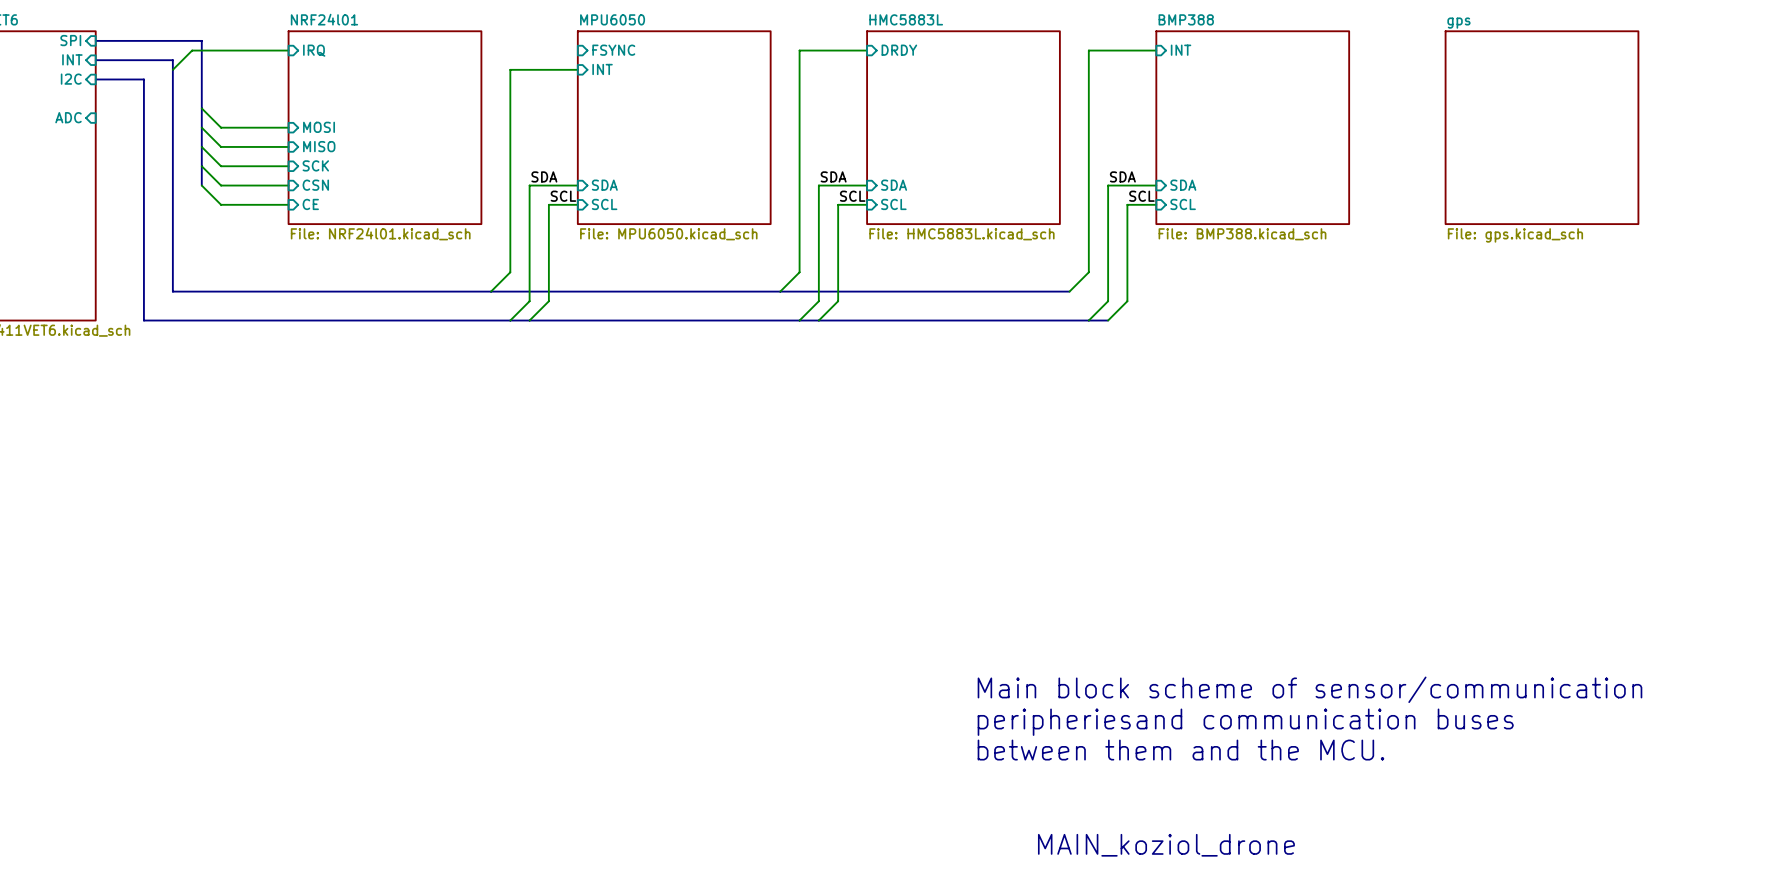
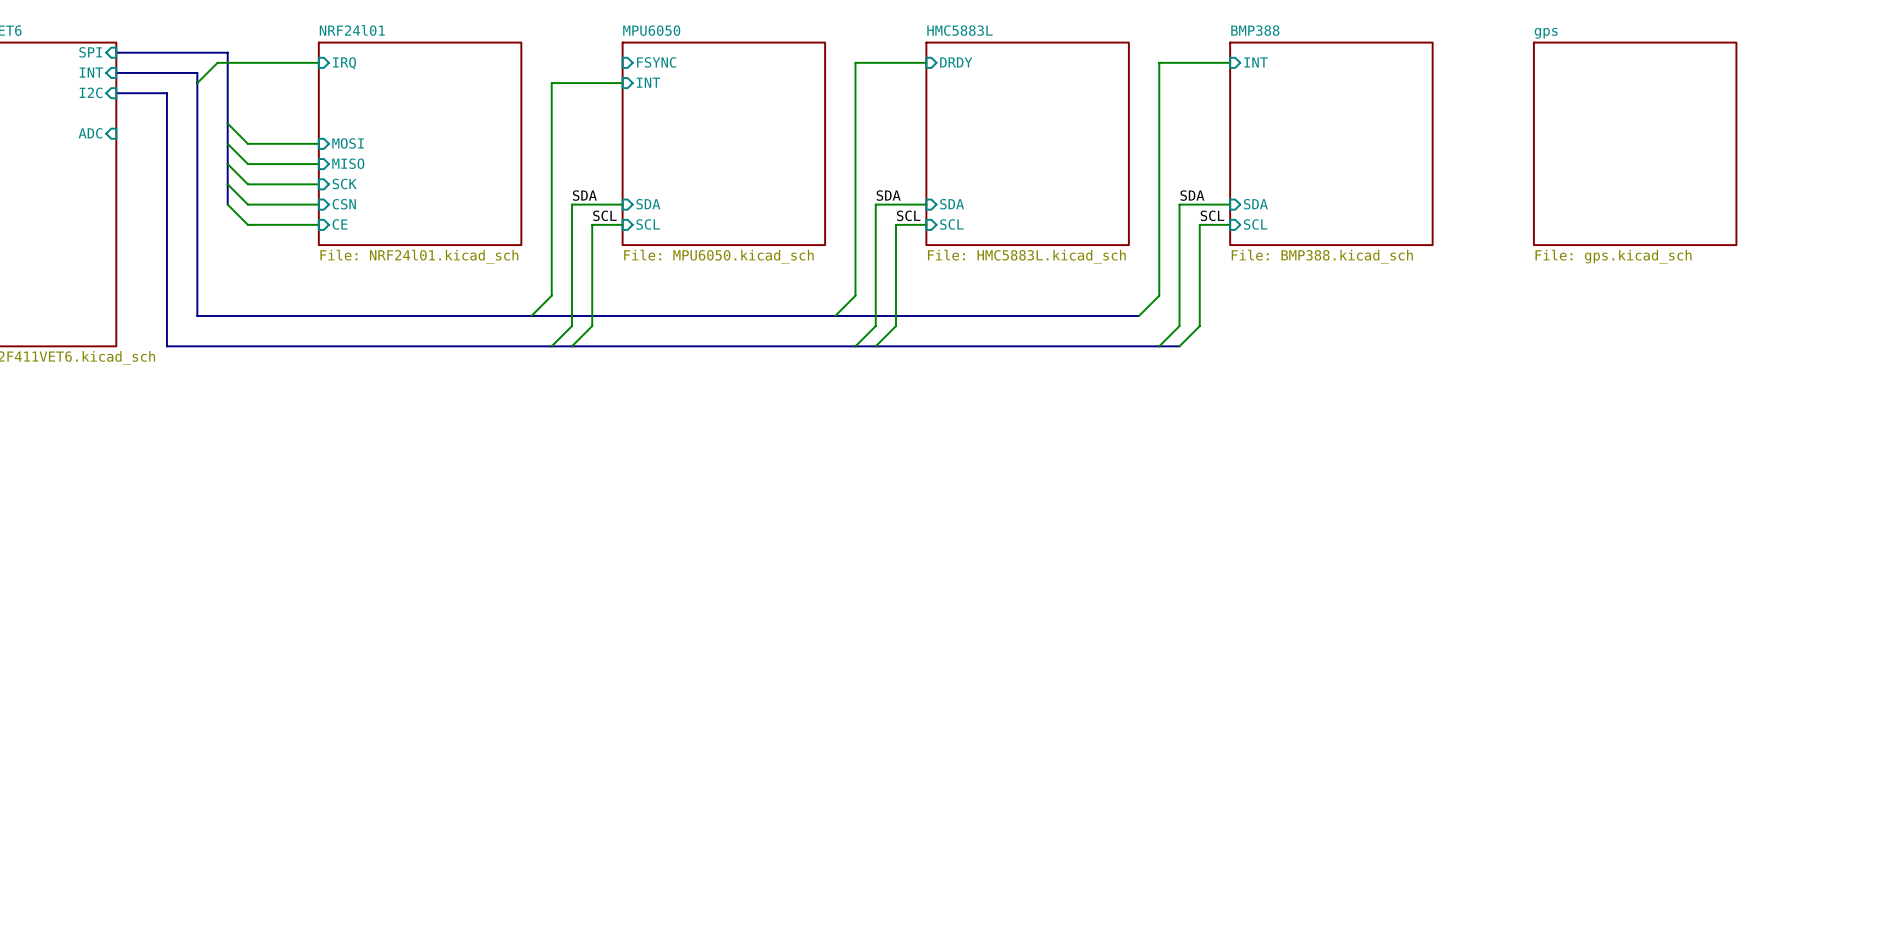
text: Main block scheme of sensor/communication (1309, 689) -> none
text: peripheriesand communication buses (1245, 722) -> none
text: between them and the MCU. (1180, 750) -> none
text: MAIN_koziol_drone (1166, 845) -> none

